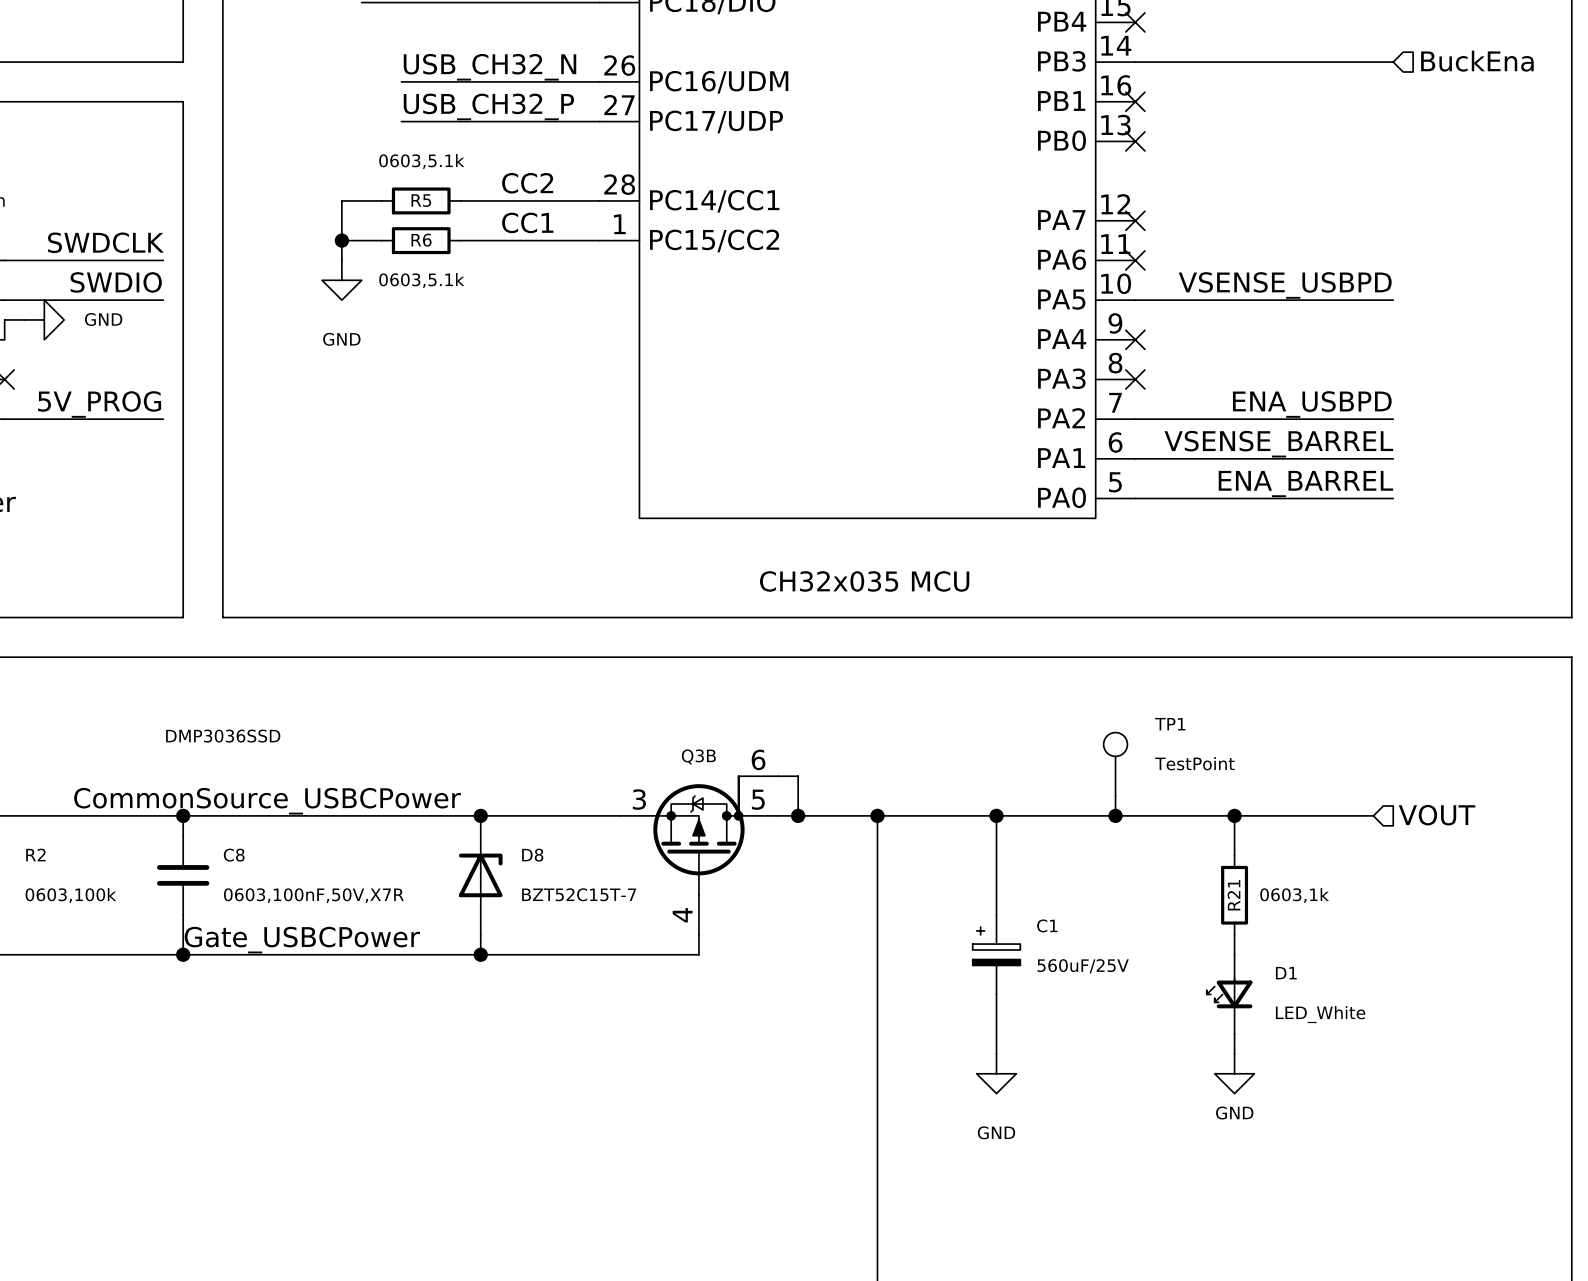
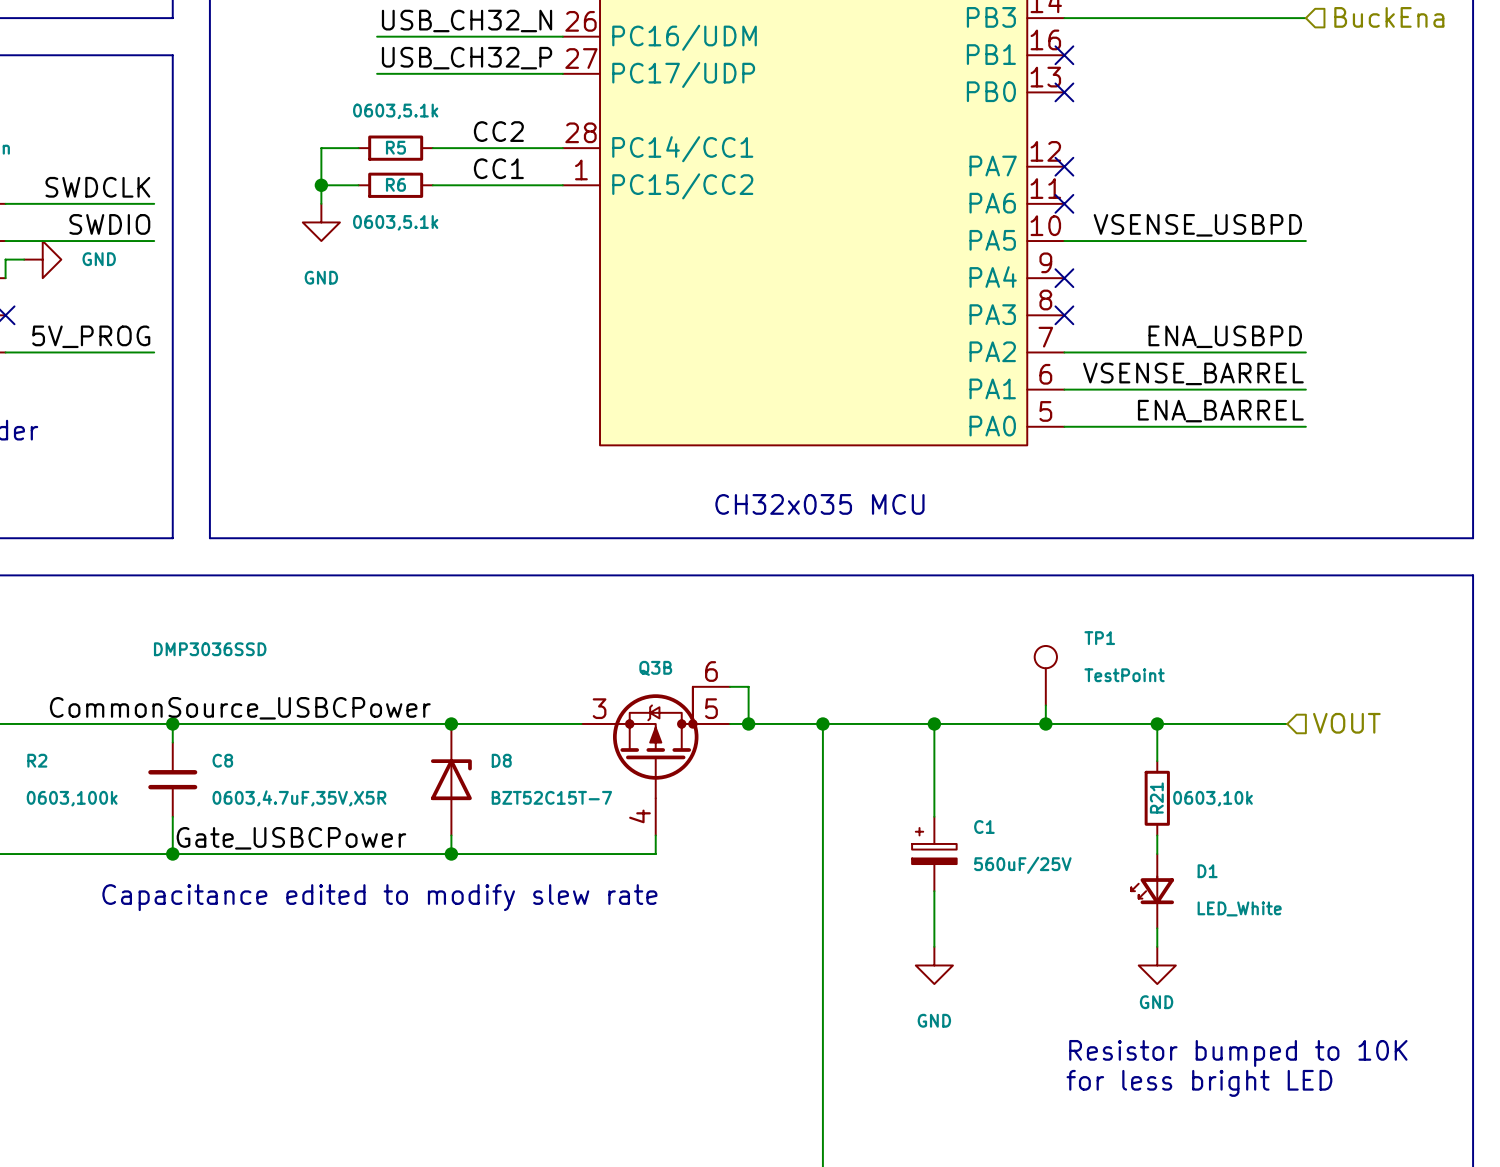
C8 value: 0603,100nF,50V,X7R (313, 895) -> 0603,4.7uF,35V,X5R (299, 798)
R21 value: 0603,1k (1294, 895) -> 0603,10k (1213, 798)
text: none -> Capacitance edited to modify slew rate (379, 897)
text: none -> Resistor bumped to 10K (1238, 1053)
text: none -> for less bright LED (1199, 1083)

